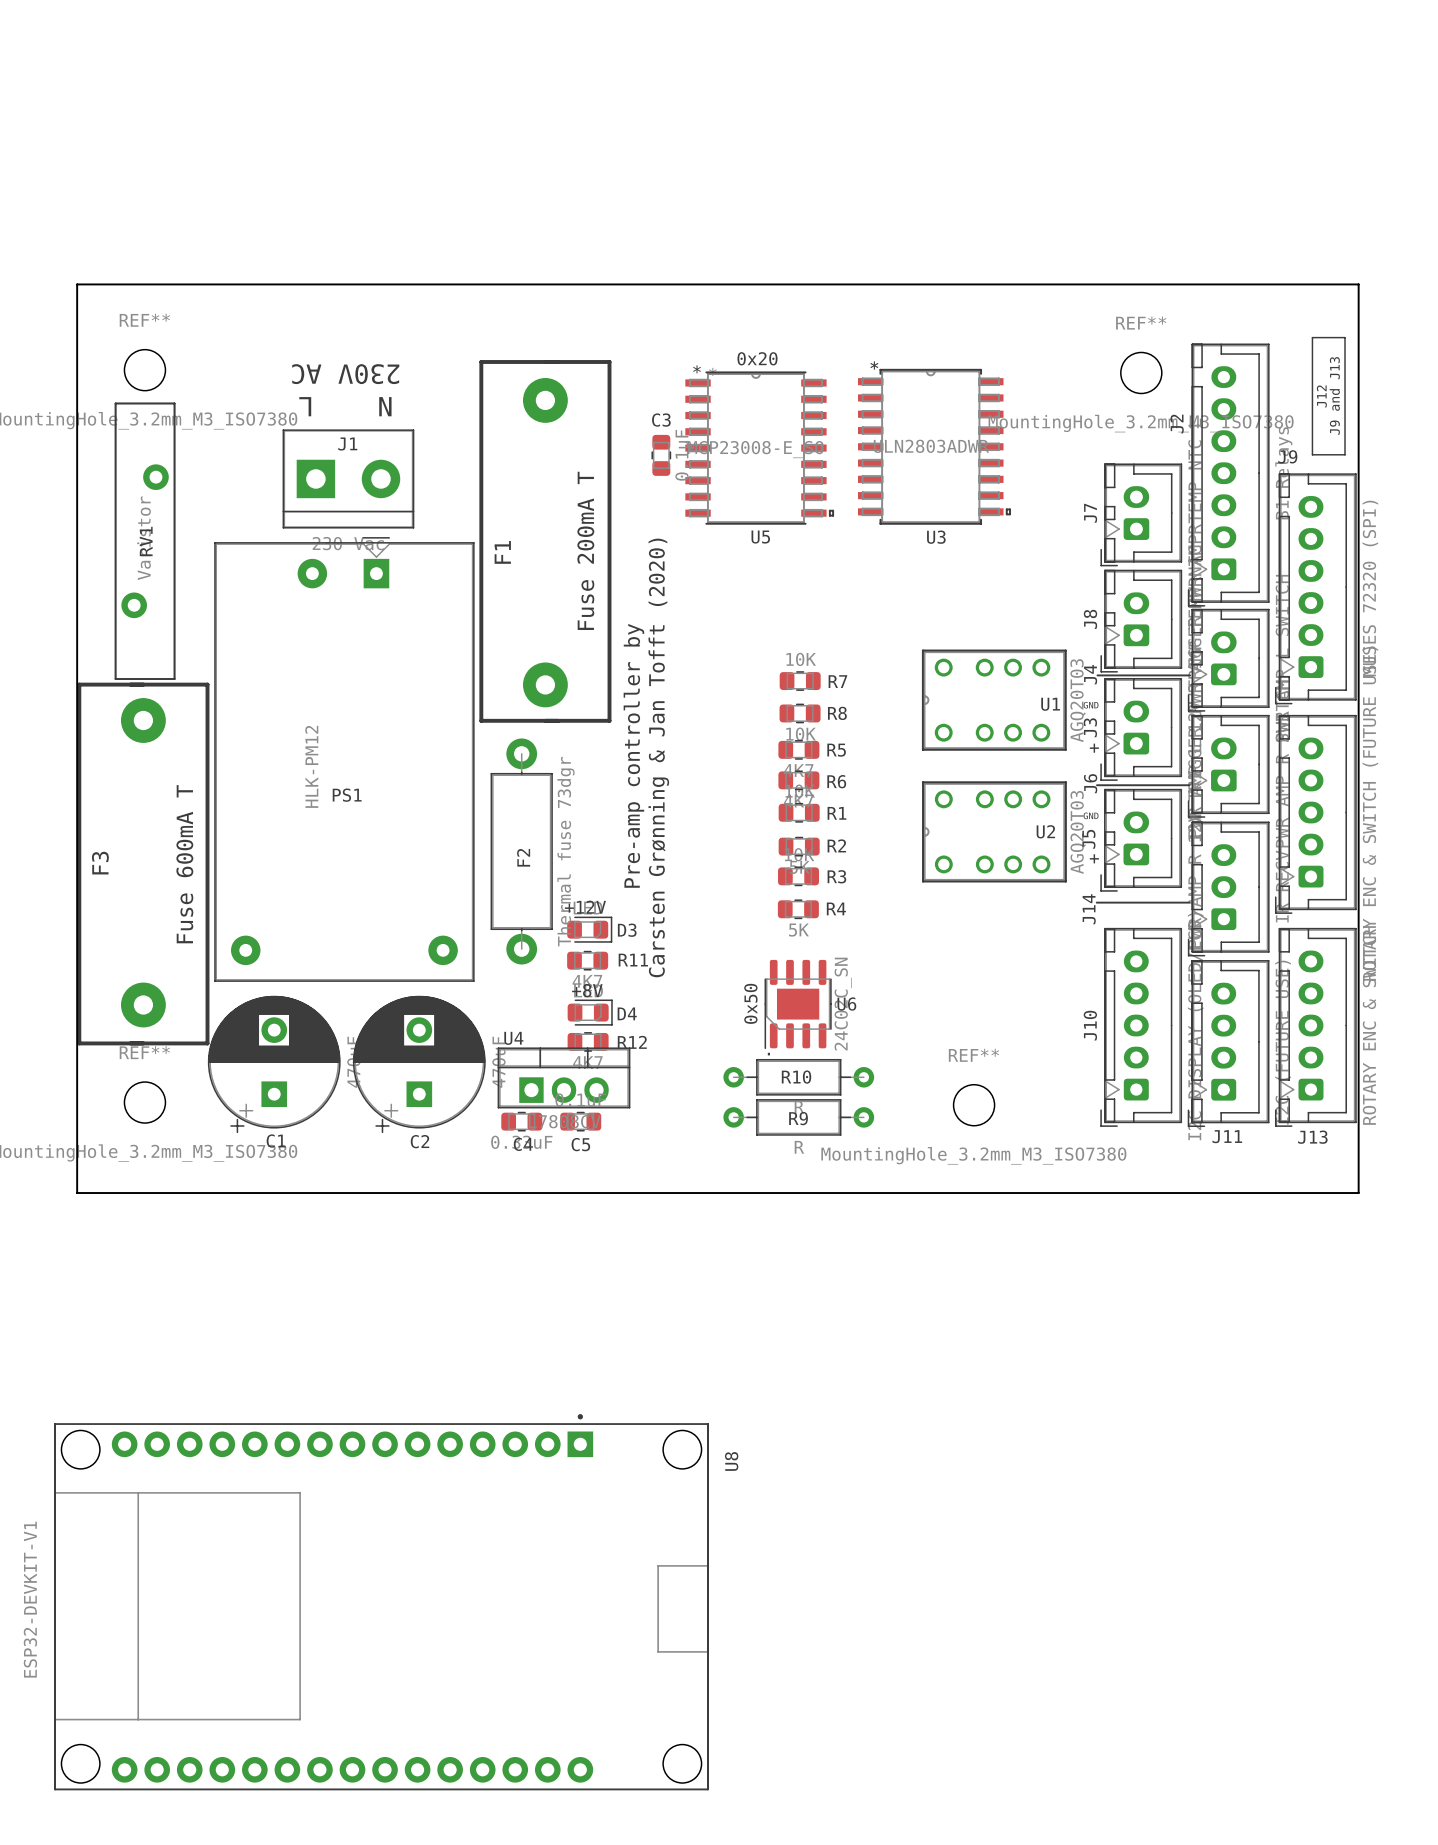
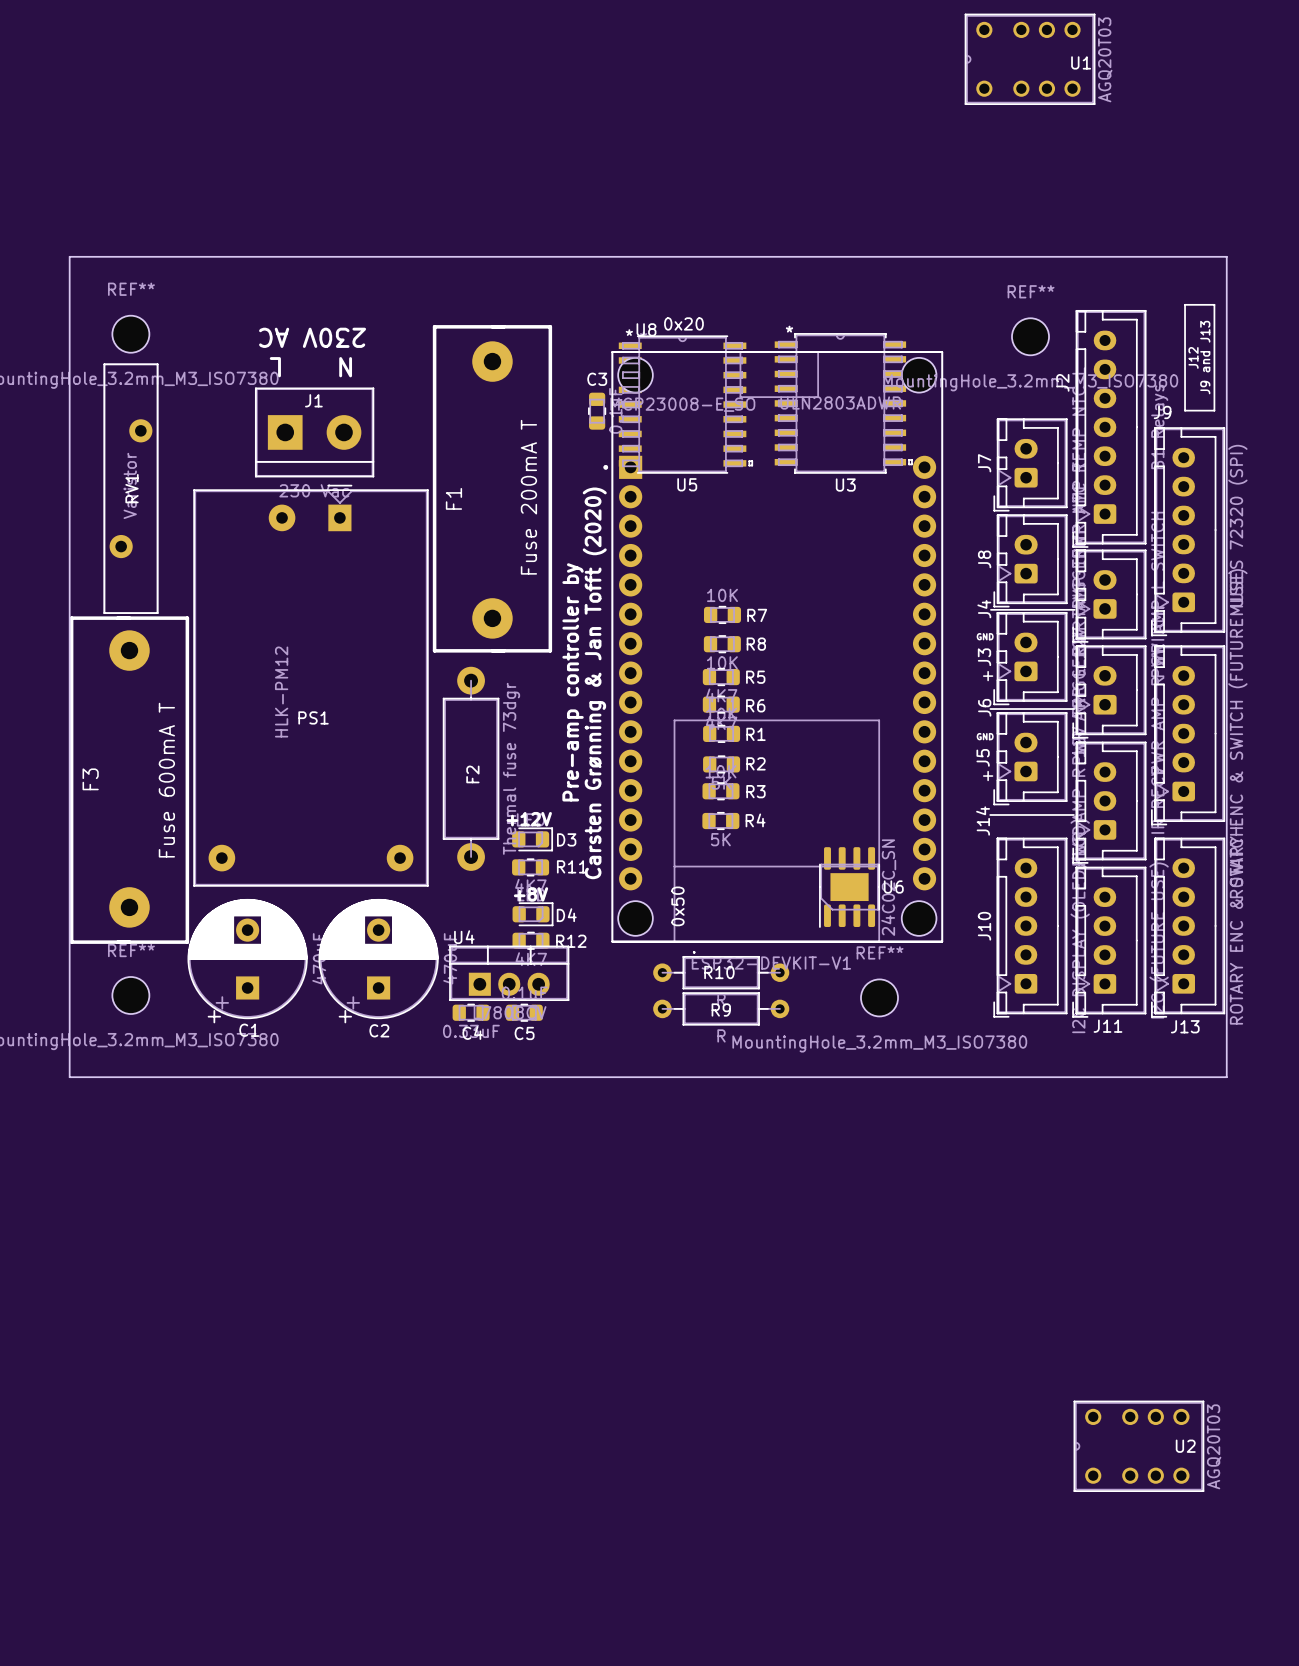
U1 position: (994, 700) -> (1030, 59)
U2 position: (994, 831) -> (1138, 1446)
U6 position: (798, 1004) -> (849, 887)
U8 rotation: 0° (381, 1602) -> 90° counterclockwise (773, 646)
U8 position: (381, 1602) -> (773, 646)

